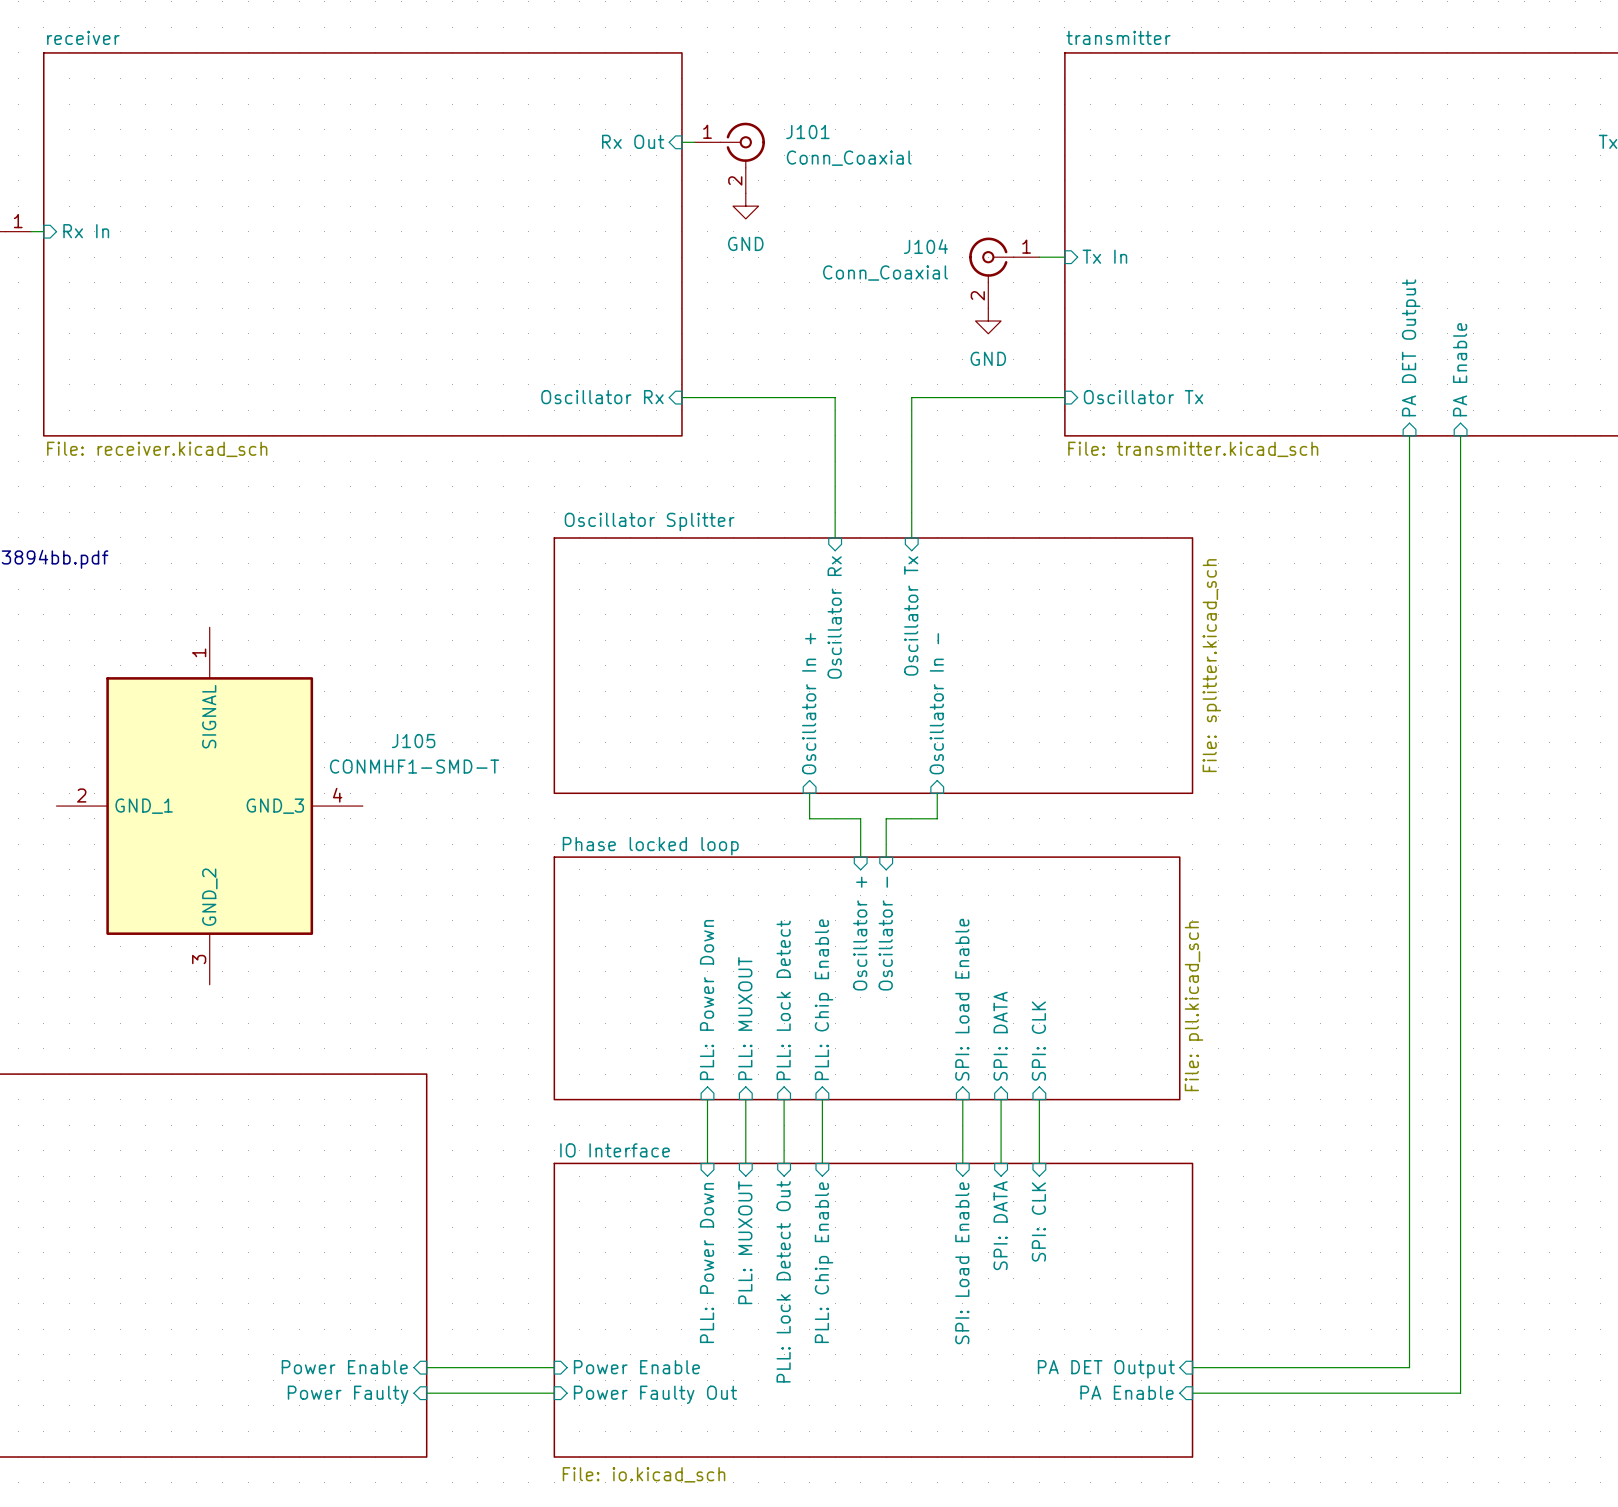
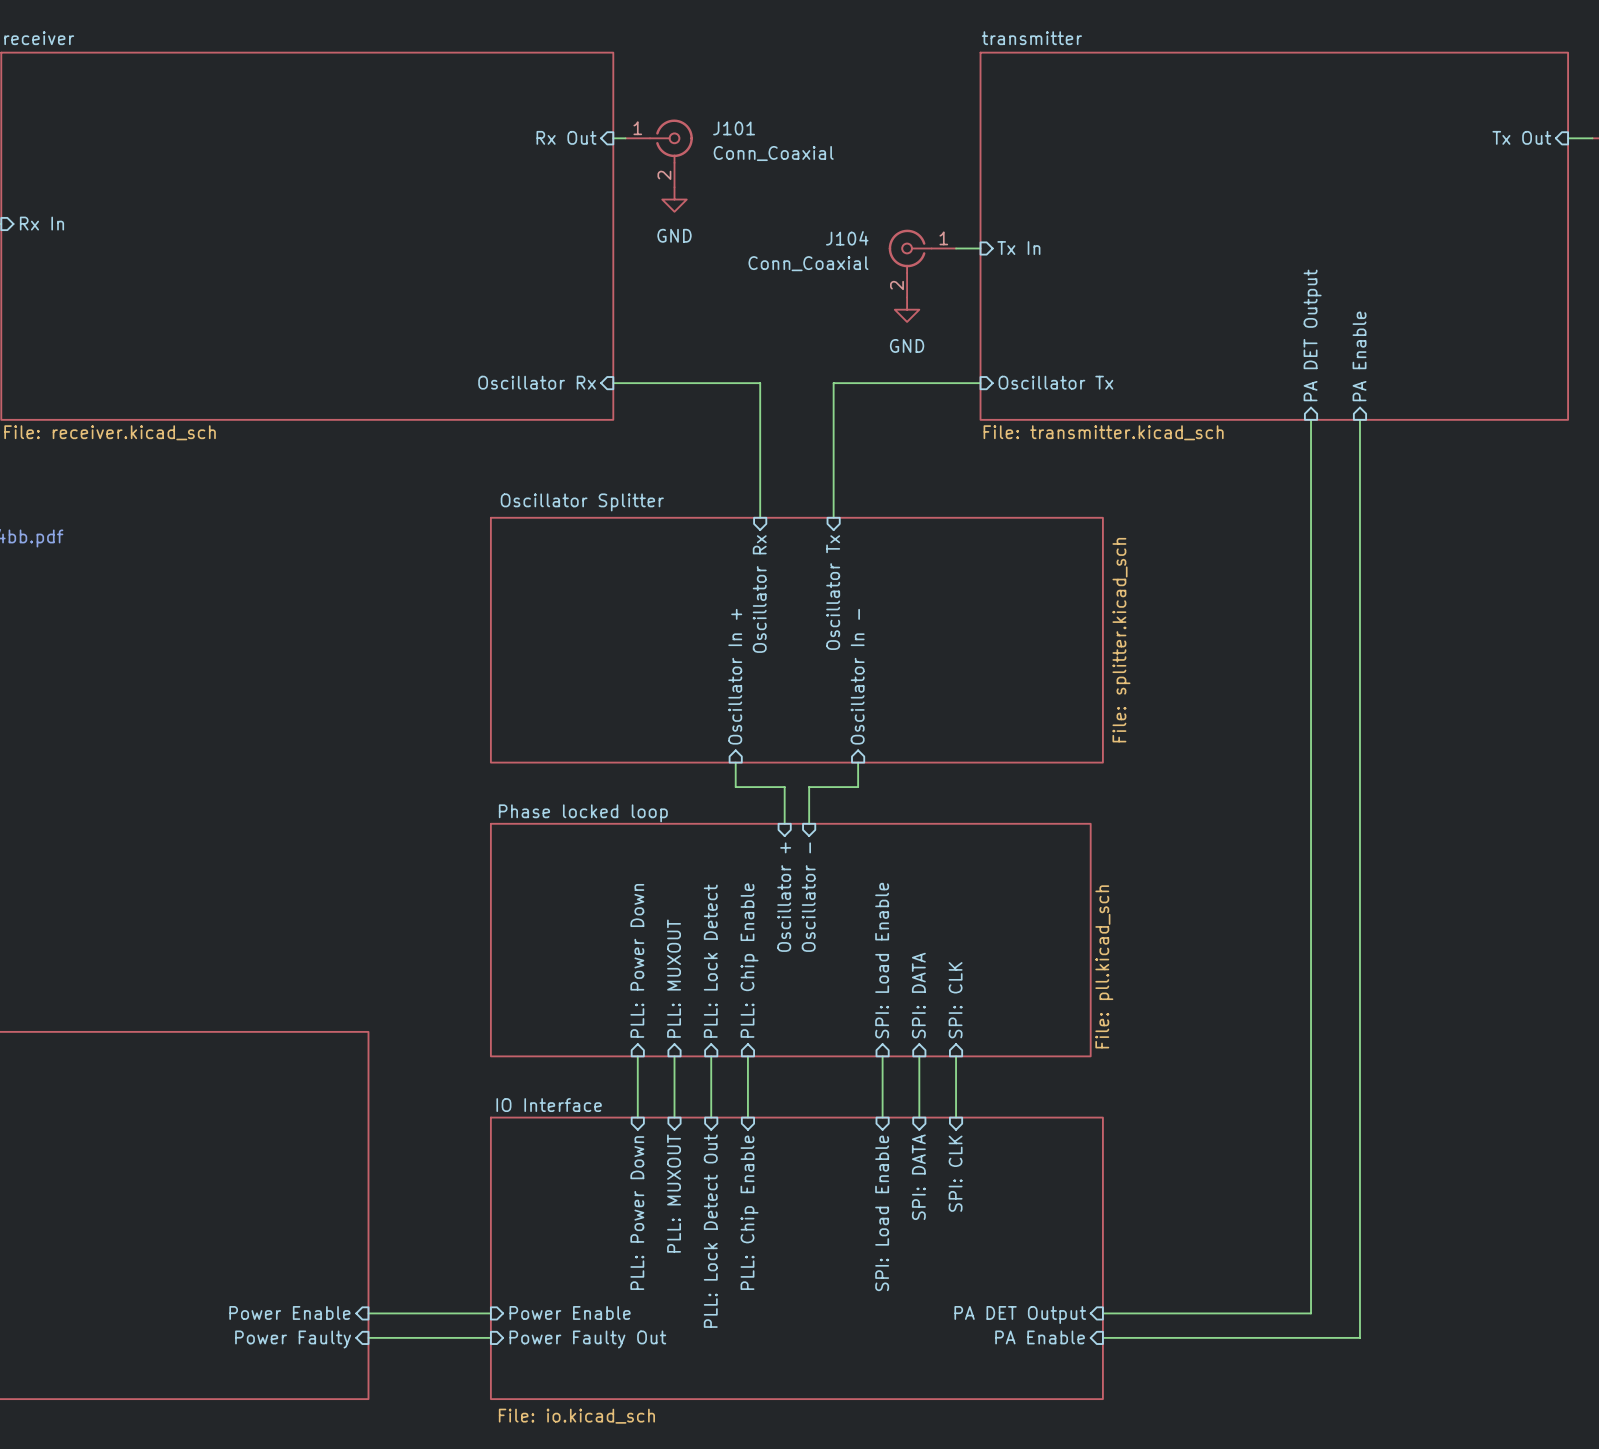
J105: CONMHF1-SMD-T (209, 806) -> none

